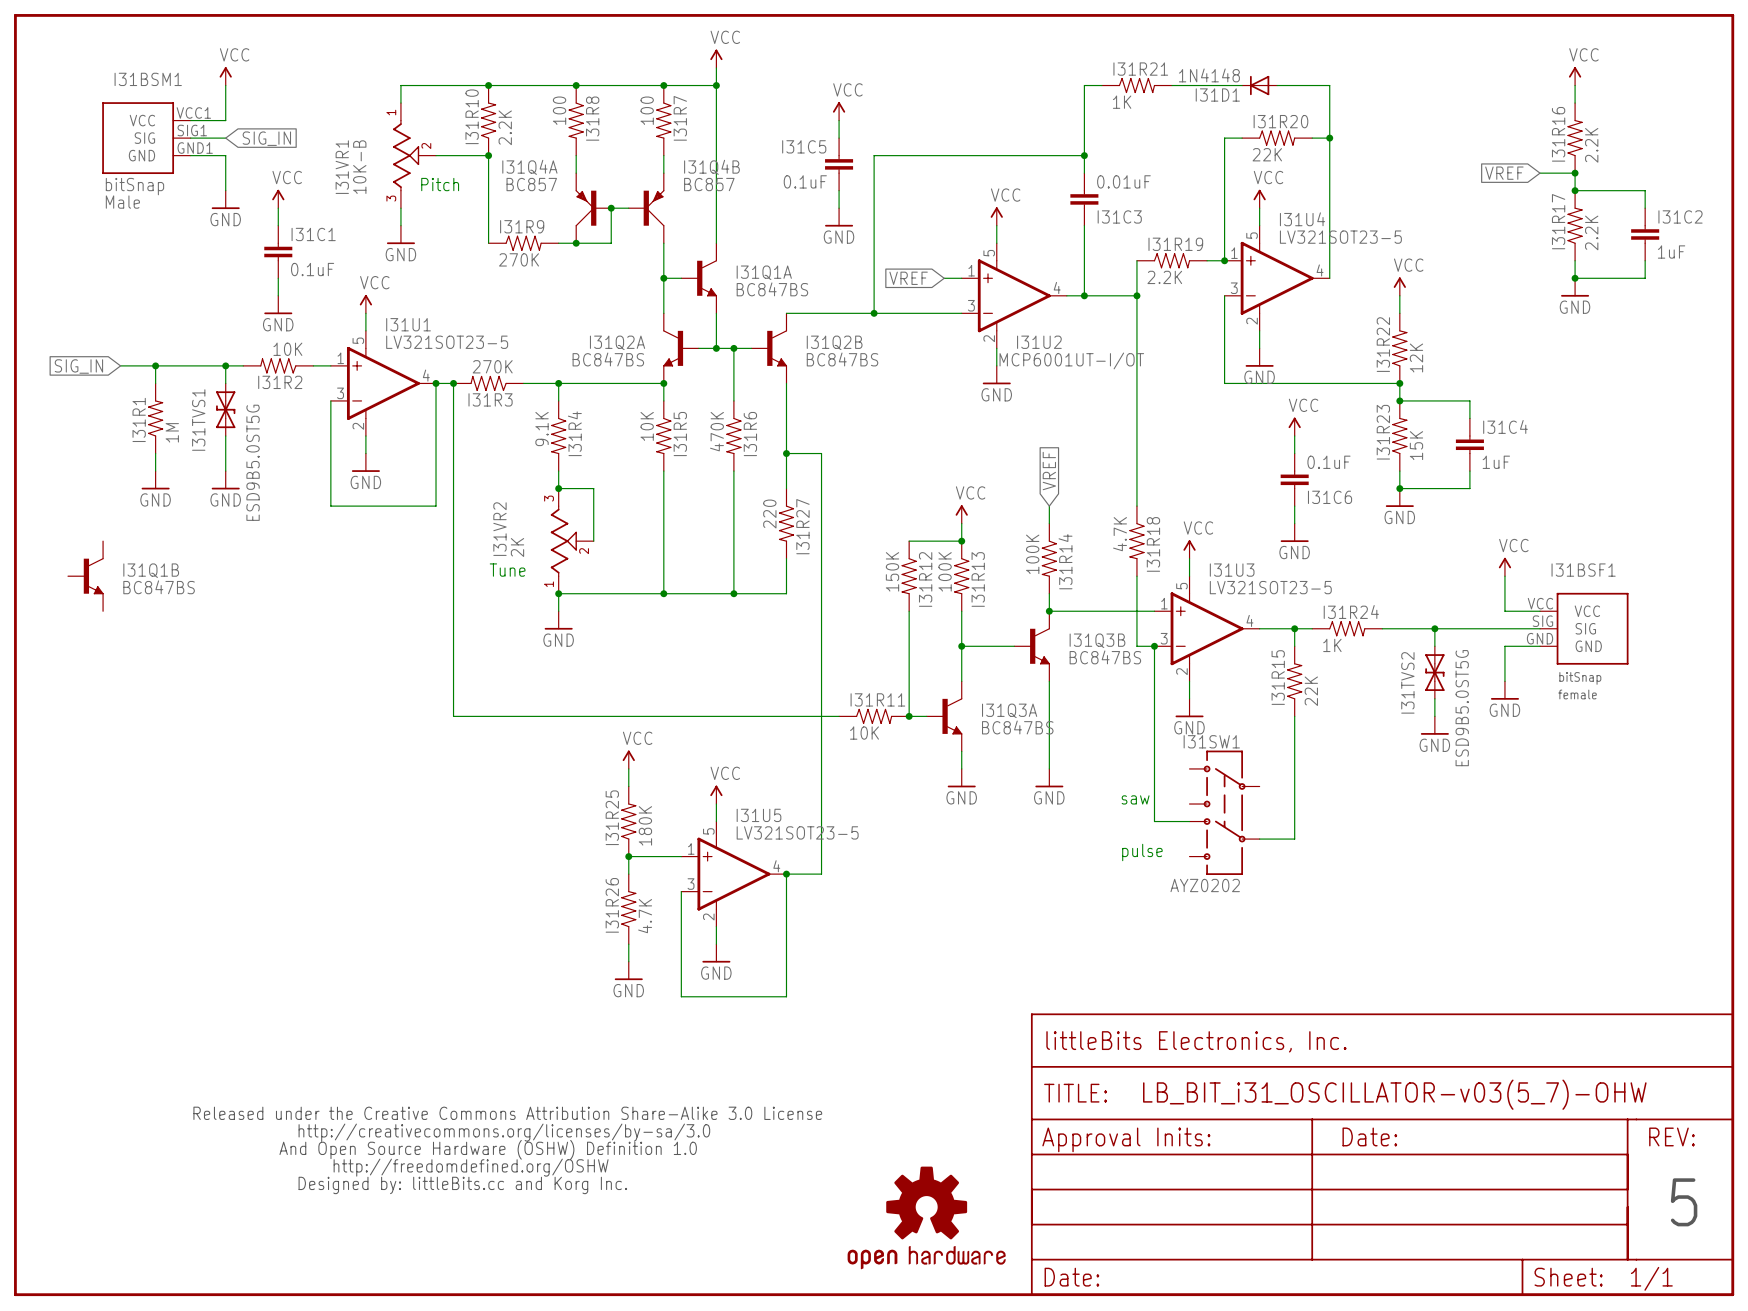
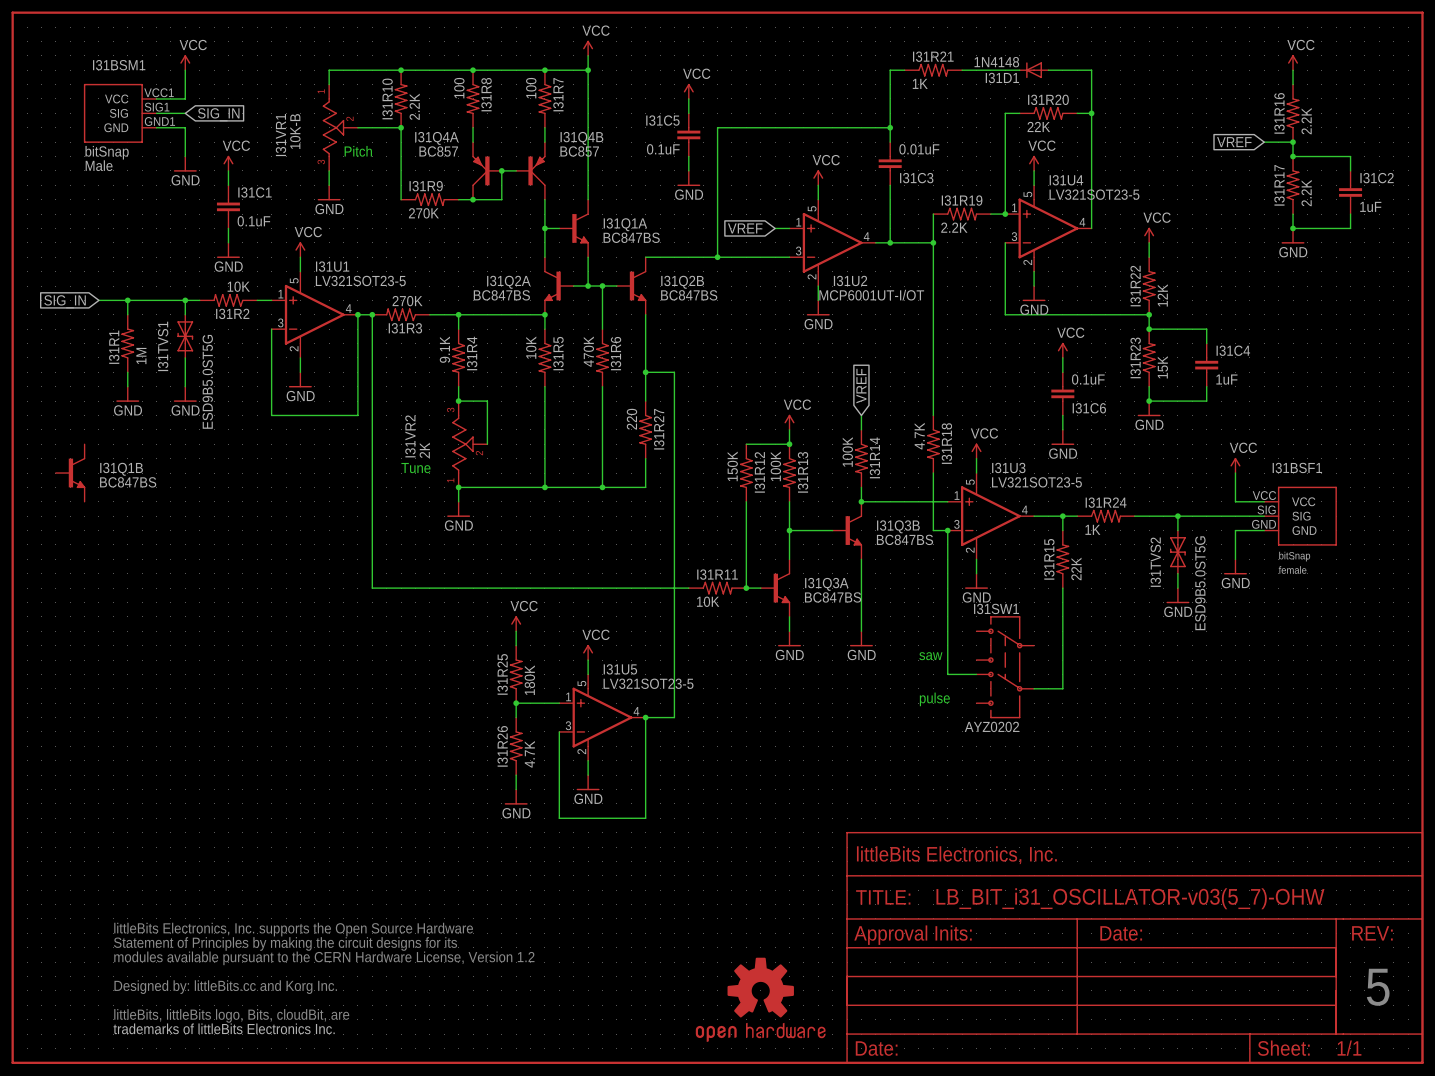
part: (507, 1150) -> none
part: none -> (324, 978)

